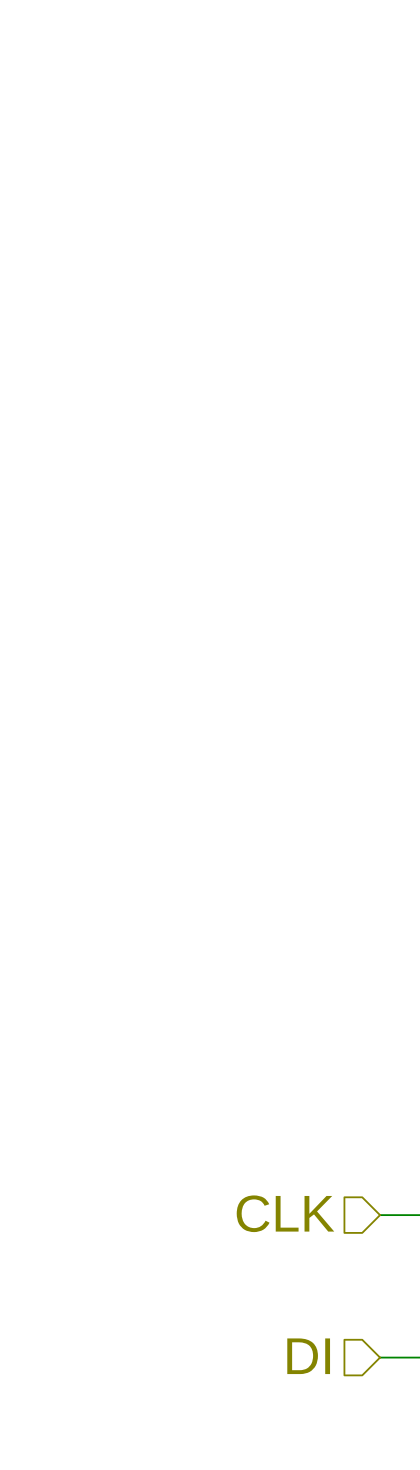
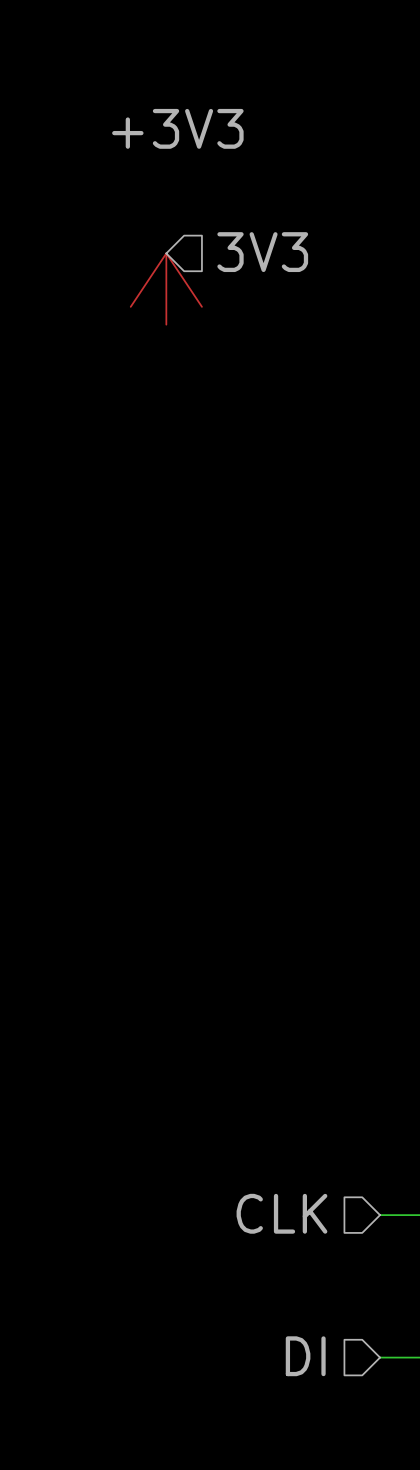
hierarchical label: none -> 3V3 (262, 252)
power symbol: none -> +3V3 (166, 289)

